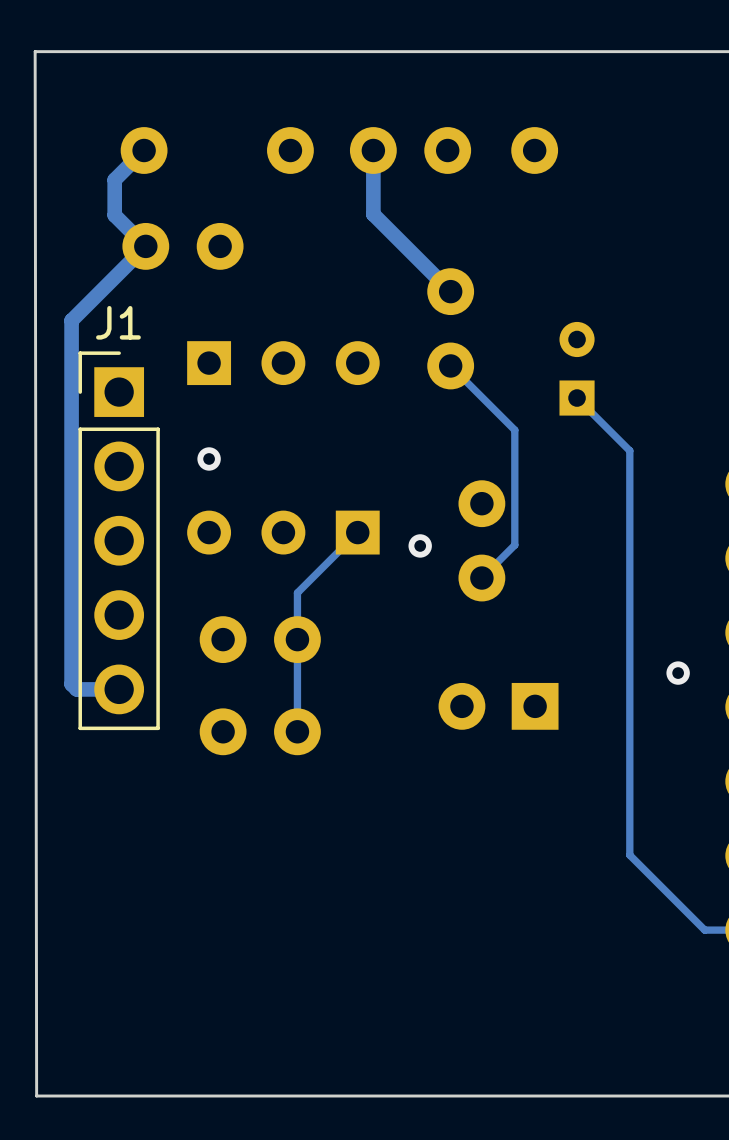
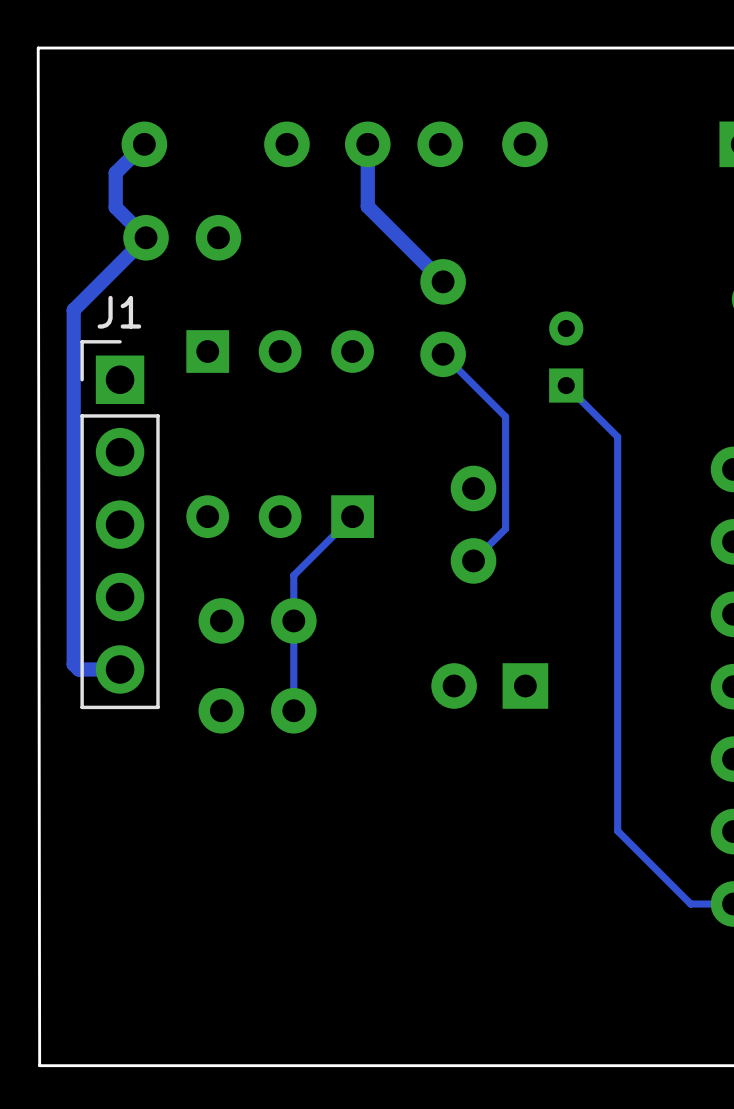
via: (209, 458) -> none
via: (420, 545) -> none
via: (678, 673) -> none

